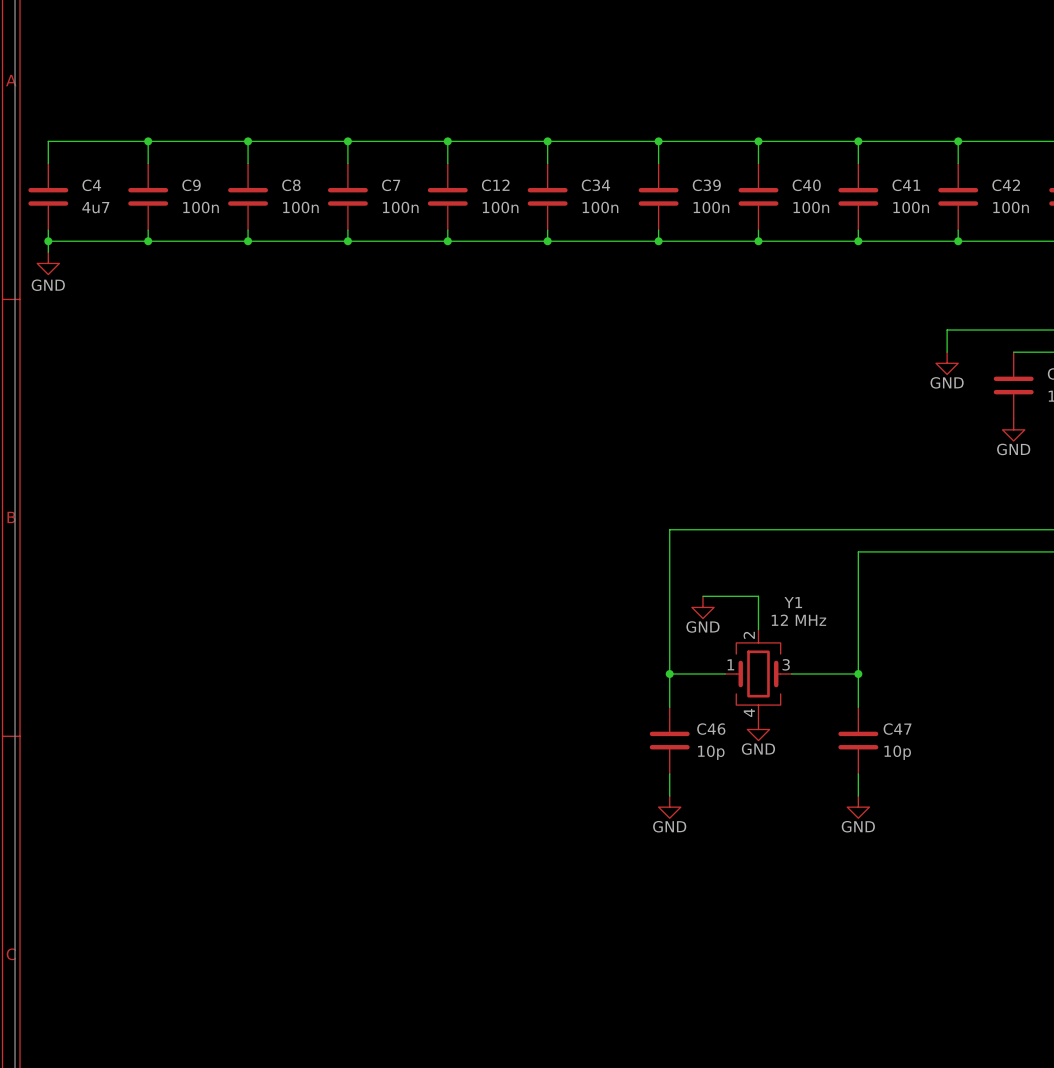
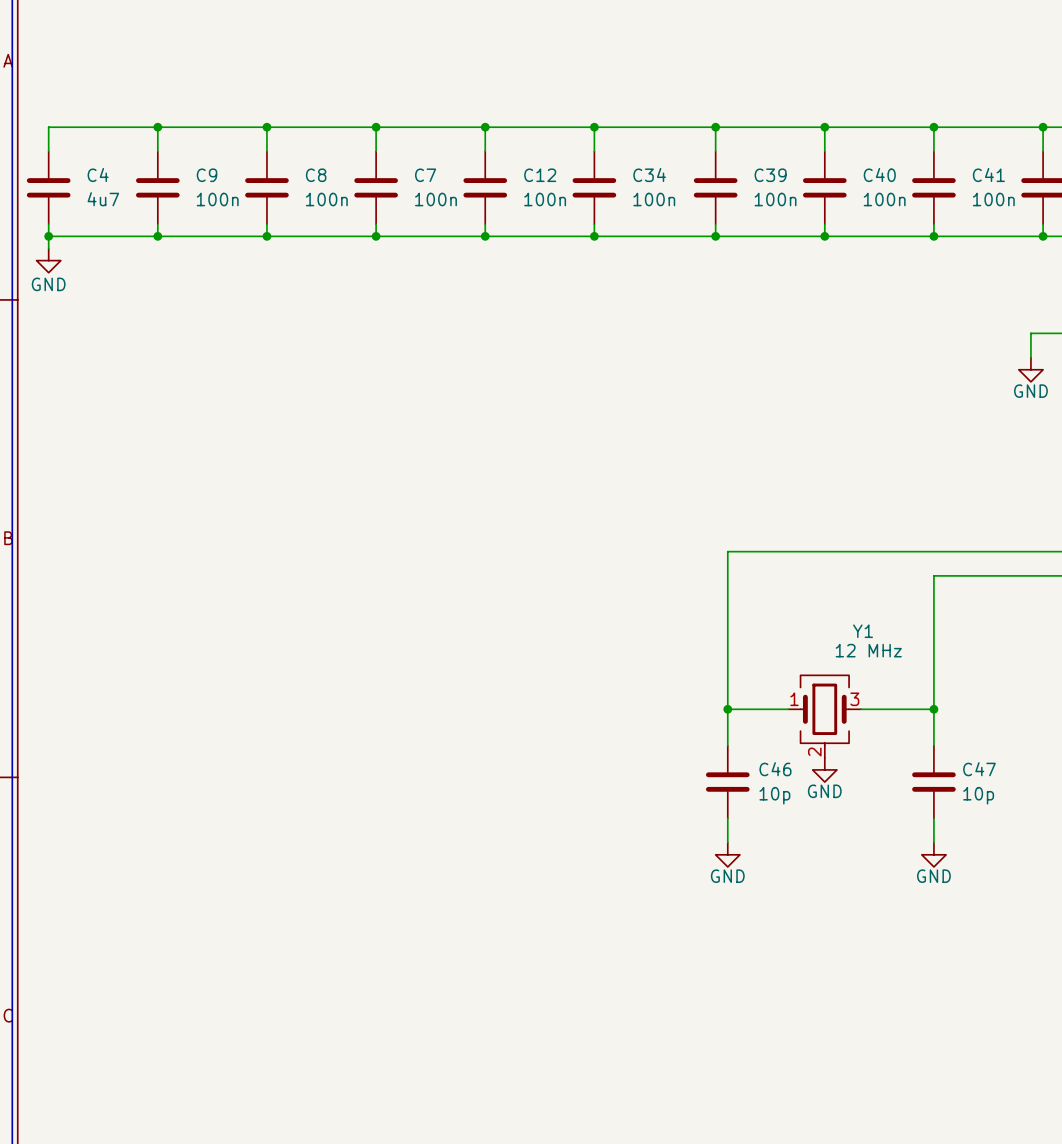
wire: (703, 596) (758, 596) (758, 629) -> none
power symbol: GND (703, 607) -> none
Y1 symbol: [725, 629, 792, 719] -> [788, 675, 862, 758]

